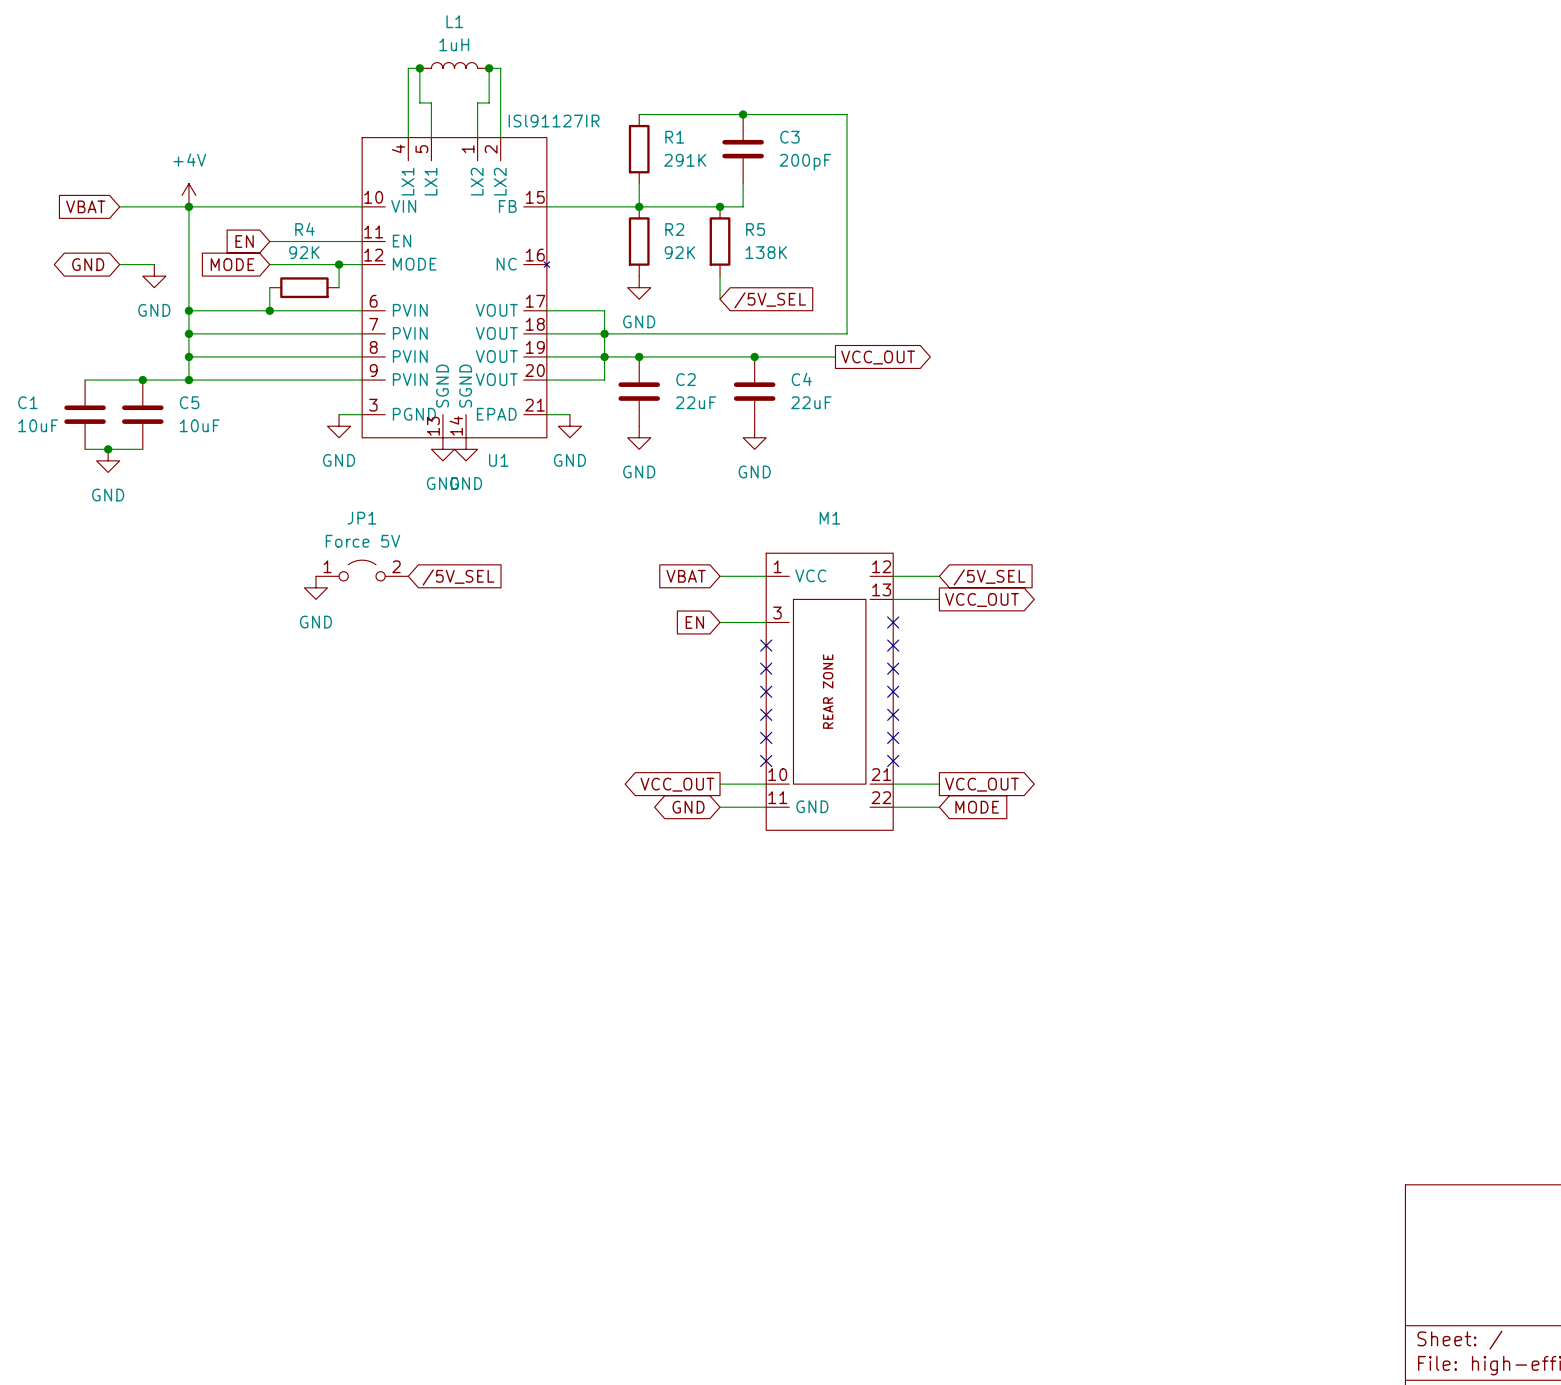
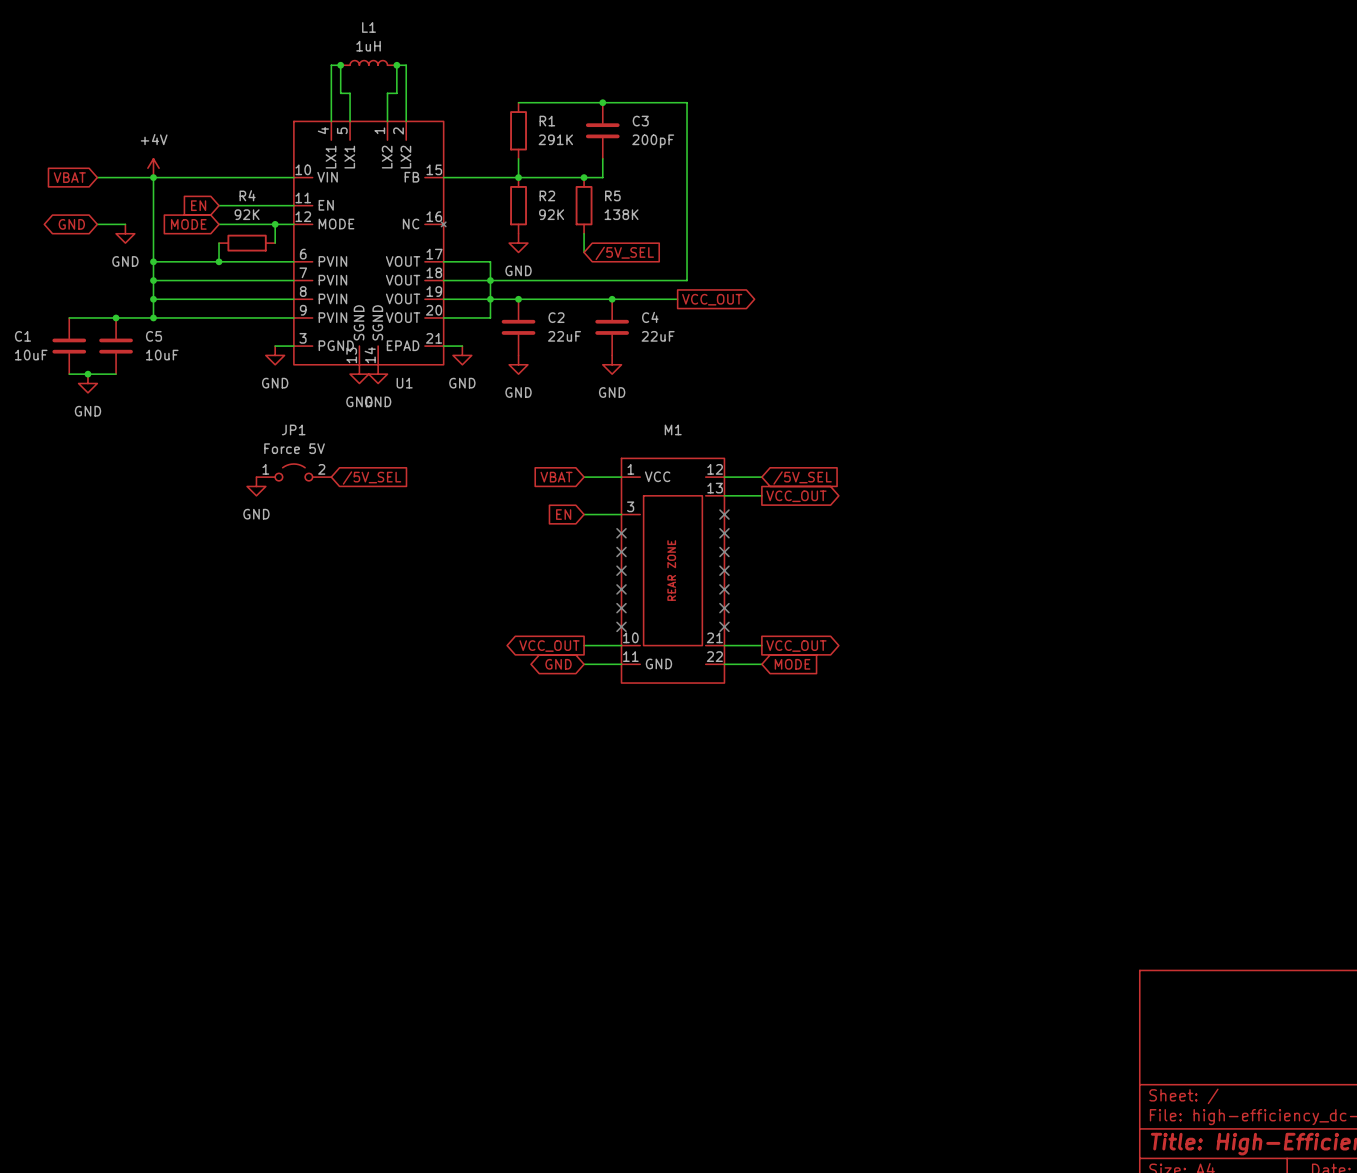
U1 value: ISl91127IR (554, 121) -> none

